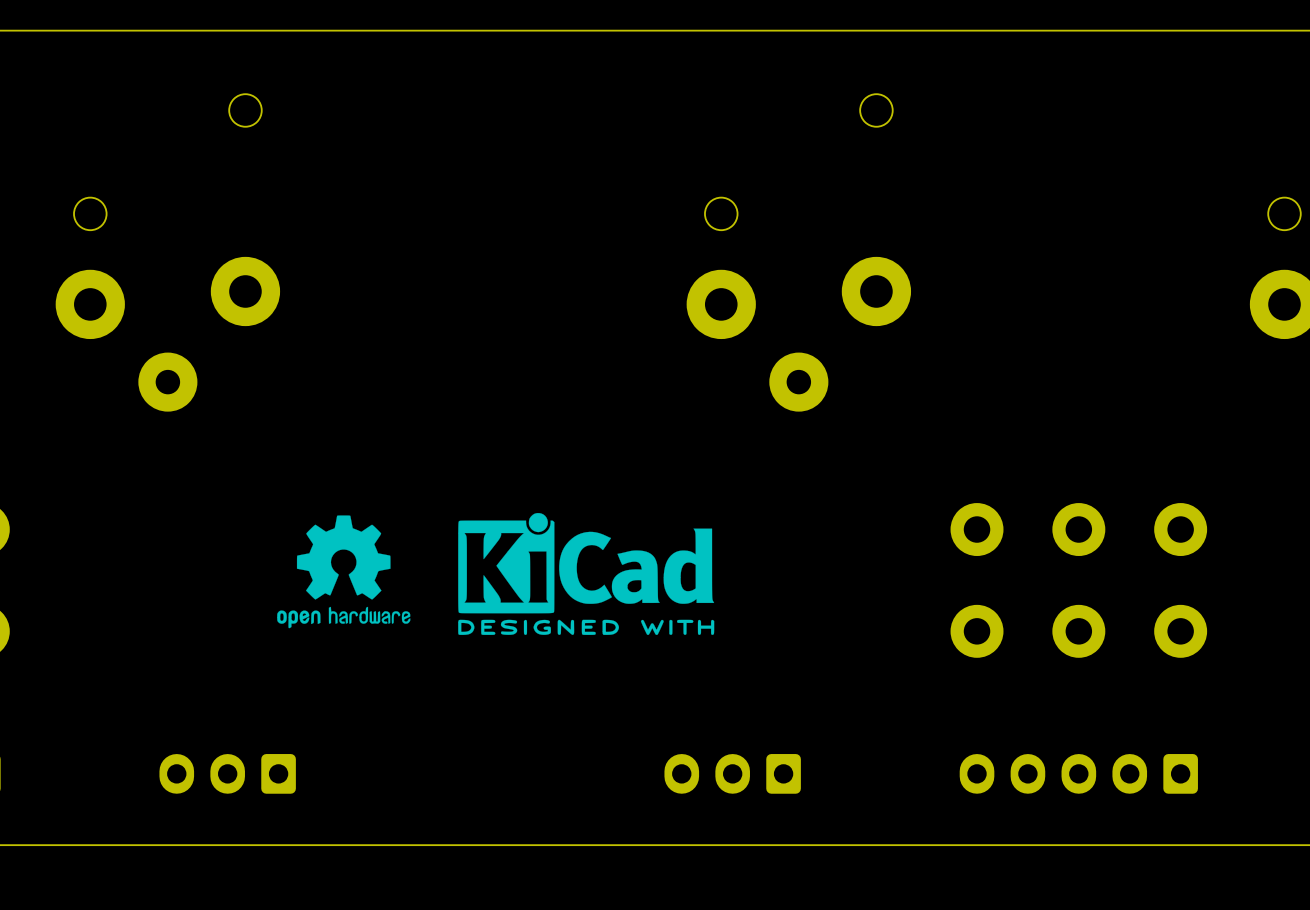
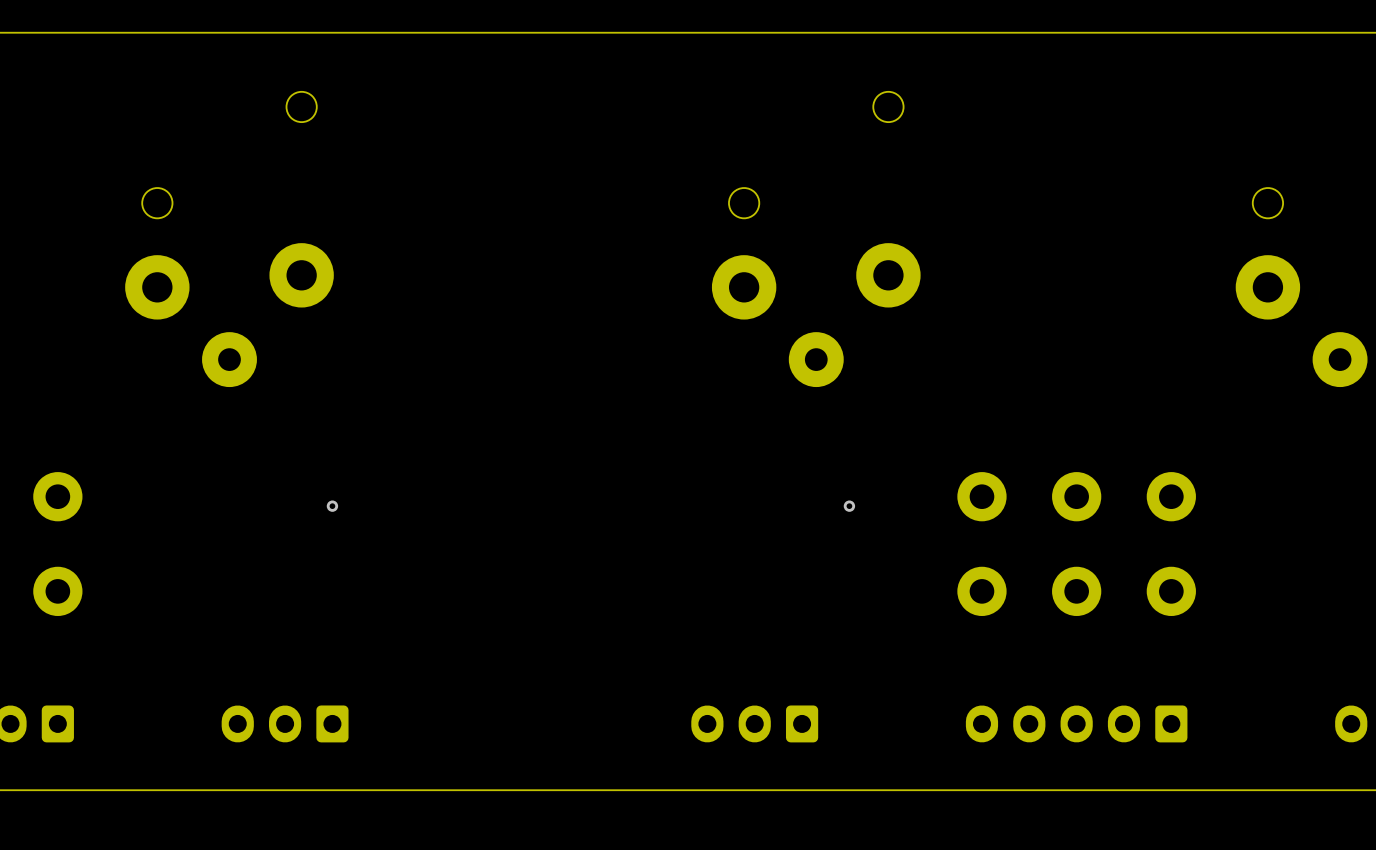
drawing: [458, 512, 715, 635] -> none
drawing: [277, 515, 411, 629] -> none
via: none -> (332, 506)
via: none -> (849, 506)

